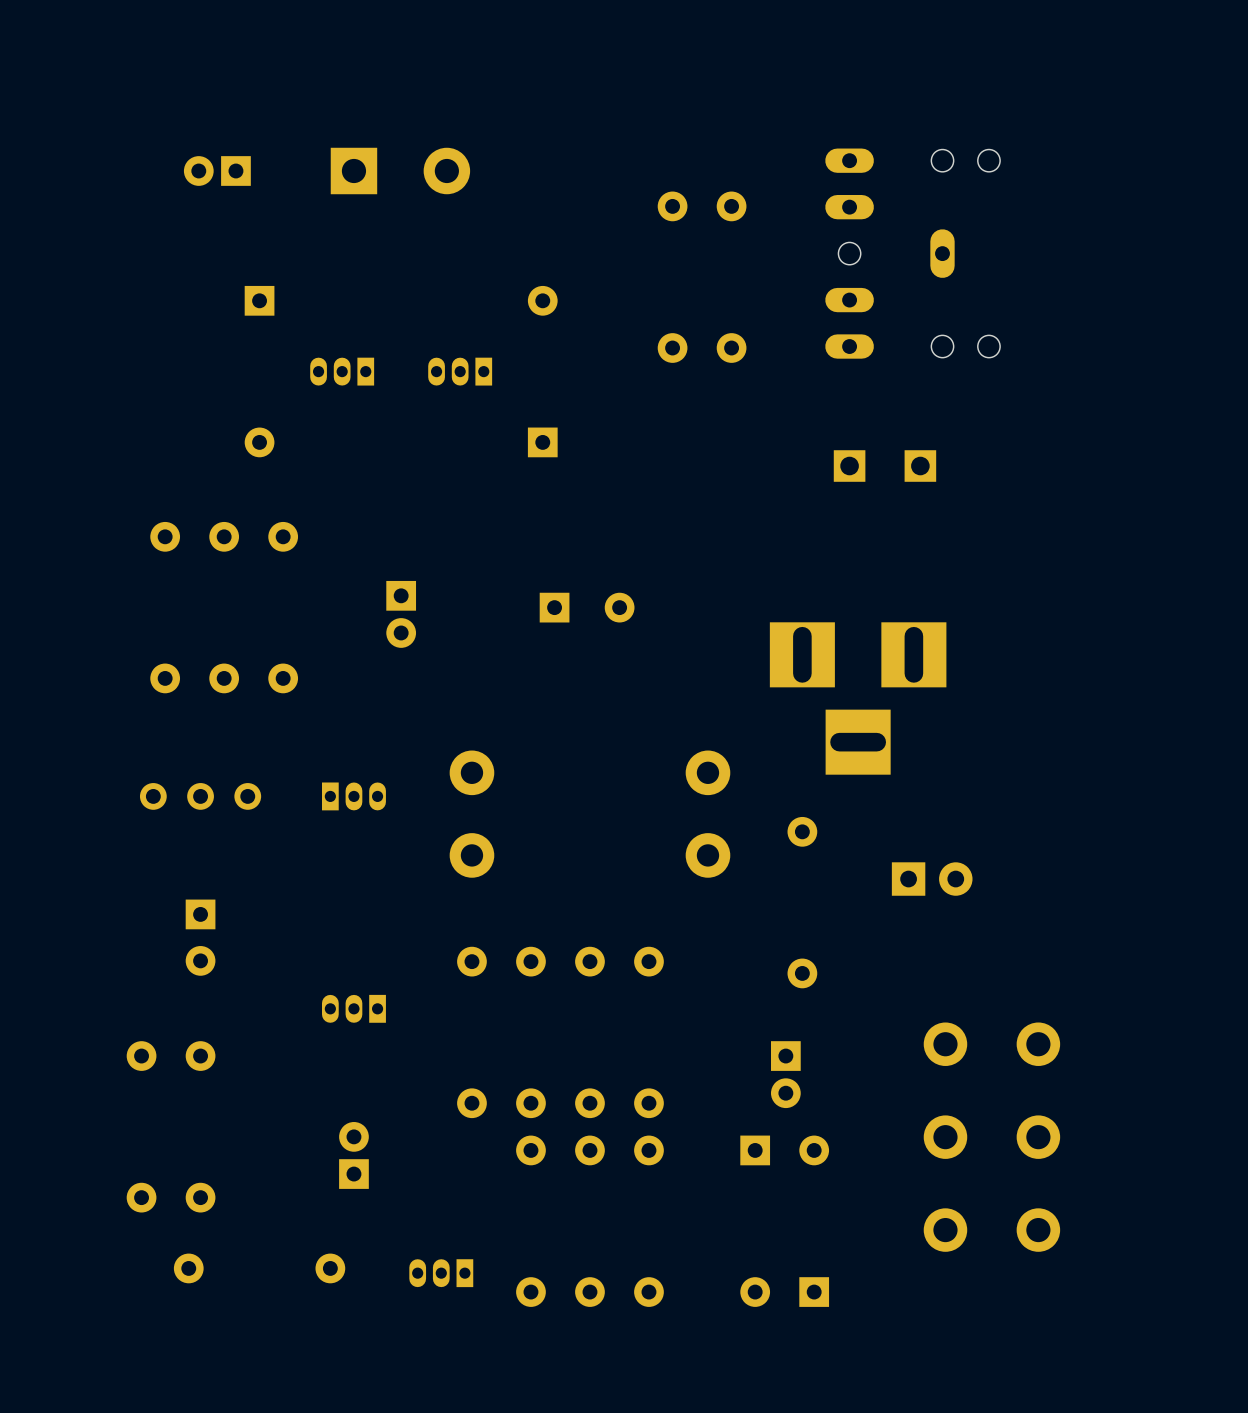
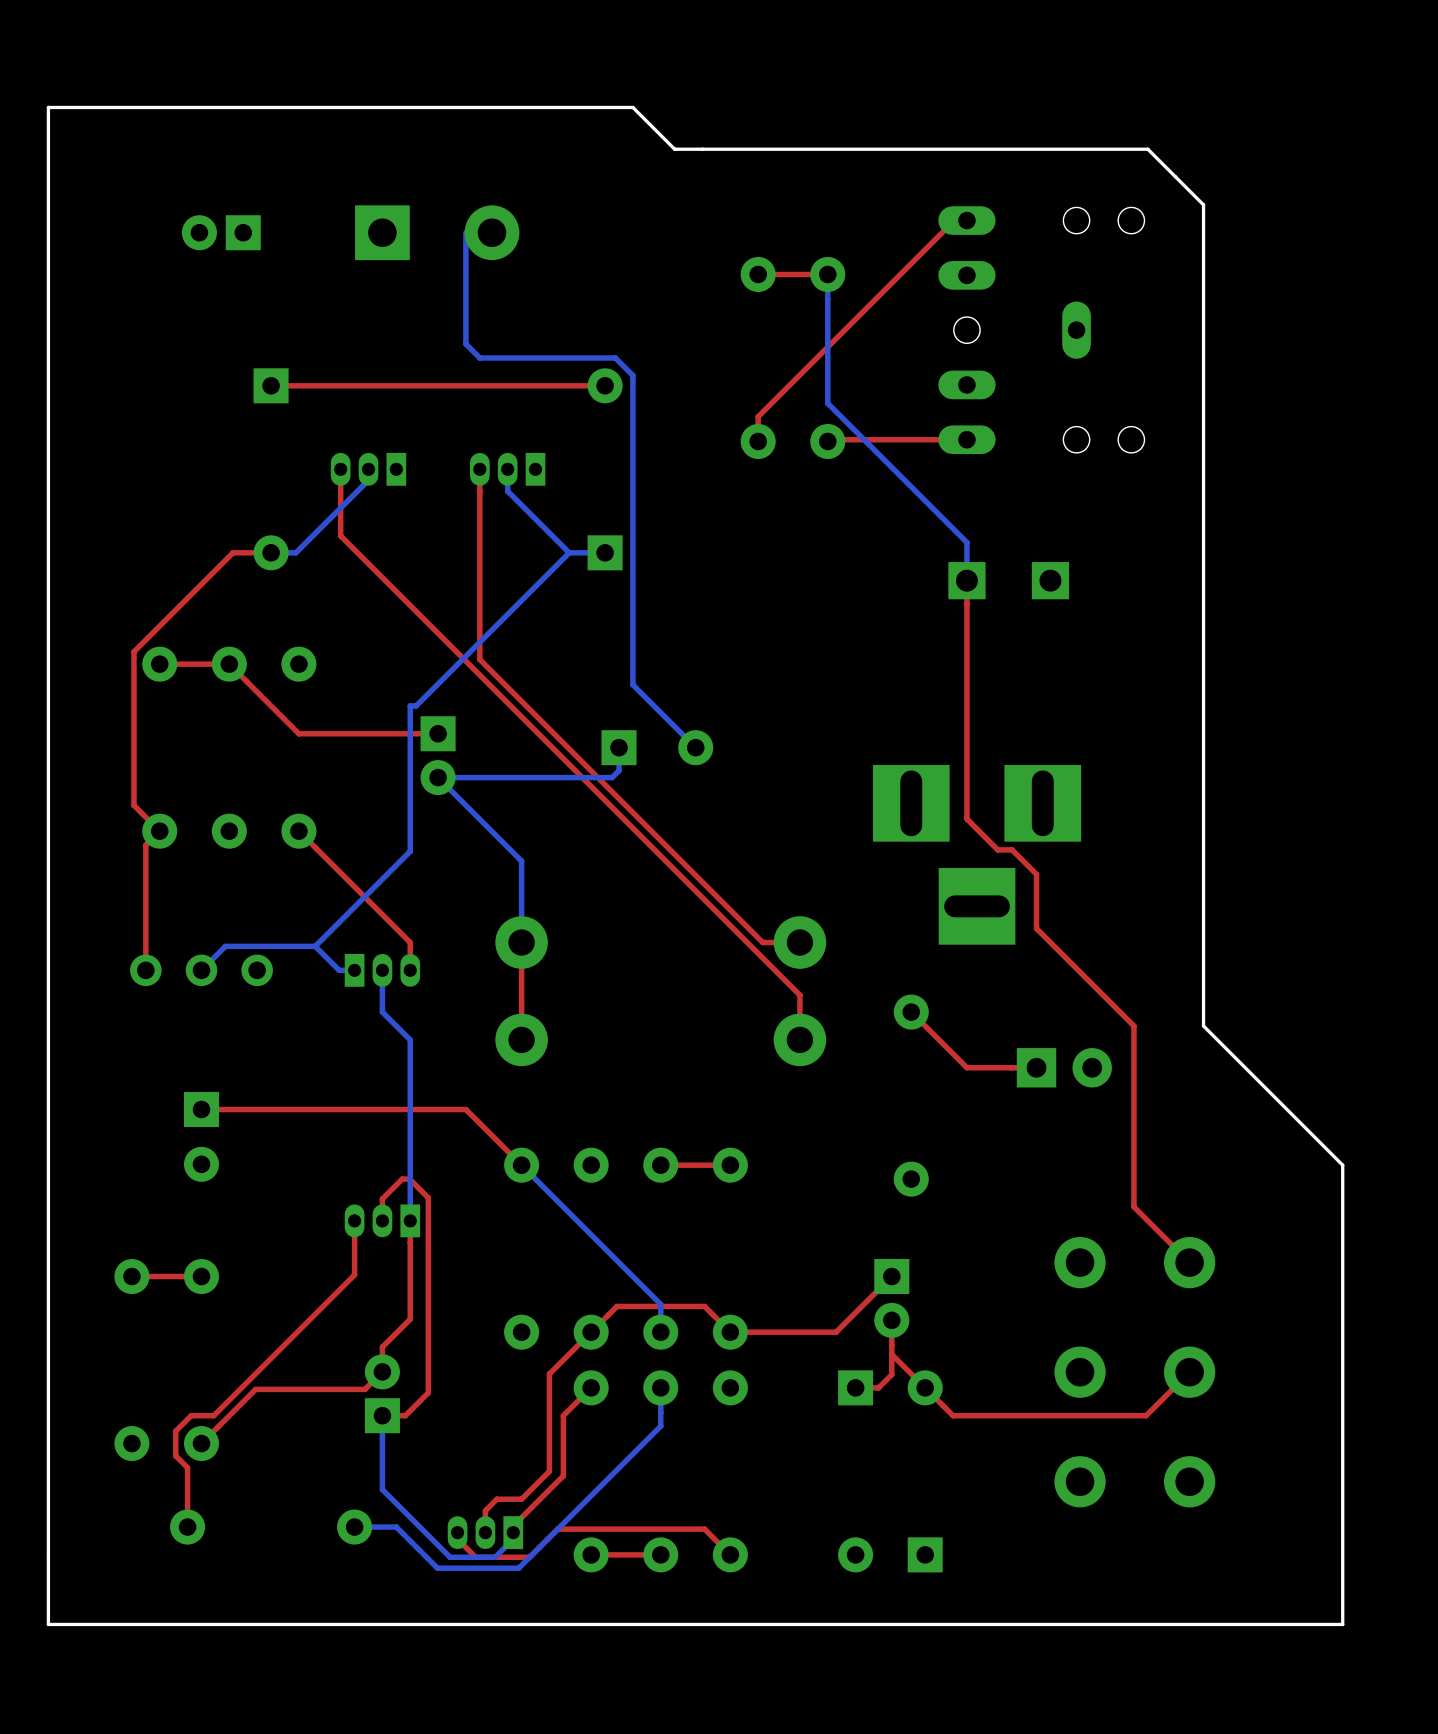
board edge: none -> (632, 107) (674, 149) (1147, 149) (1203, 204) (1203, 1026) (1342, 1165) (1342, 1624) (48, 1624) (48, 107) (632, 107)
top track: none -> (966, 220) (954, 220) (758, 416) (758, 441)
bottom track: none -> (465, 232) (465, 344) (479, 357) (615, 357) (632, 375) (632, 684) (695, 747)
top track: none -> (827, 274) (758, 274)
bottom track: none -> (827, 274) (827, 403) (966, 542) (966, 580)
top track: none -> (605, 385) (271, 385)
top track: none -> (966, 439) (829, 439) (827, 441)
top track: none -> (340, 469) (340, 535) (799, 995) (799, 1039)
bottom track: none -> (368, 469) (368, 480) (295, 552) (271, 552)
top track: none -> (479, 469) (479, 659) (762, 942) (799, 942)
bottom track: none -> (507, 469) (507, 491) (569, 552)
top track: none -> (271, 552) (232, 552) (133, 651) (133, 805) (159, 831) (145, 845) (145, 970)
bottom track: none -> (569, 552) (416, 705) (410, 705) (410, 851) (315, 946)
bottom track: none -> (605, 552) (569, 552)
top track: none -> (966, 580) (966, 819) (997, 849) (1012, 849) (1036, 874) (1036, 928) (1133, 1026) (1133, 1206) (1189, 1262)
top track: none -> (159, 664) (229, 664) (298, 733) (438, 733)
bottom track: none -> (619, 747) (619, 770) (612, 777) (438, 777) (521, 861) (521, 942)
top track: none -> (298, 831) (410, 942) (410, 970)
top track: none -> (521, 942) (521, 1039)
bottom track: none -> (315, 946) (339, 970) (354, 970)
bottom track: none -> (315, 946) (225, 946) (201, 970)
bottom track: none -> (382, 970) (382, 1012) (410, 1039) (410, 1220)
top track: none -> (911, 1012) (966, 1067) (1036, 1067)
top track: none -> (201, 1109) (465, 1109) (521, 1165)
bottom track: none -> (521, 1165) (660, 1304) (660, 1332)
top track: none -> (730, 1165) (660, 1165)
top track: none -> (354, 1220) (354, 1274) (213, 1415) (191, 1415) (175, 1431) (175, 1455) (187, 1467) (187, 1527)
top track: none -> (382, 1220) (382, 1198) (402, 1179) (409, 1179) (428, 1197) (428, 1392) (405, 1415) (382, 1415)
top track: none -> (410, 1220) (410, 1319) (382, 1347) (382, 1371) (364, 1389) (255, 1389) (201, 1443)
top track: none -> (201, 1276) (131, 1276)
top track: none -> (891, 1276) (836, 1332) (730, 1332) (704, 1306) (616, 1306) (549, 1373) (549, 1471) (521, 1499) (496, 1499) (485, 1510) (485, 1532)
top track: none -> (891, 1320) (891, 1374) (878, 1387) (855, 1387)
top track: none -> (891, 1354) (953, 1415) (1146, 1415) (1189, 1372)
top track: none -> (591, 1387) (563, 1415) (563, 1475) (513, 1526) (513, 1532)
bottom track: none -> (660, 1387) (660, 1426) (518, 1568) (437, 1568) (396, 1527) (354, 1527)
bottom track: none -> (382, 1415) (382, 1489) (450, 1557) (495, 1557) (513, 1539) (513, 1532)
top track: none -> (457, 1532) (457, 1539) (475, 1557) (529, 1557) (557, 1529) (704, 1529) (730, 1554)
top track: none -> (660, 1554) (591, 1554)

